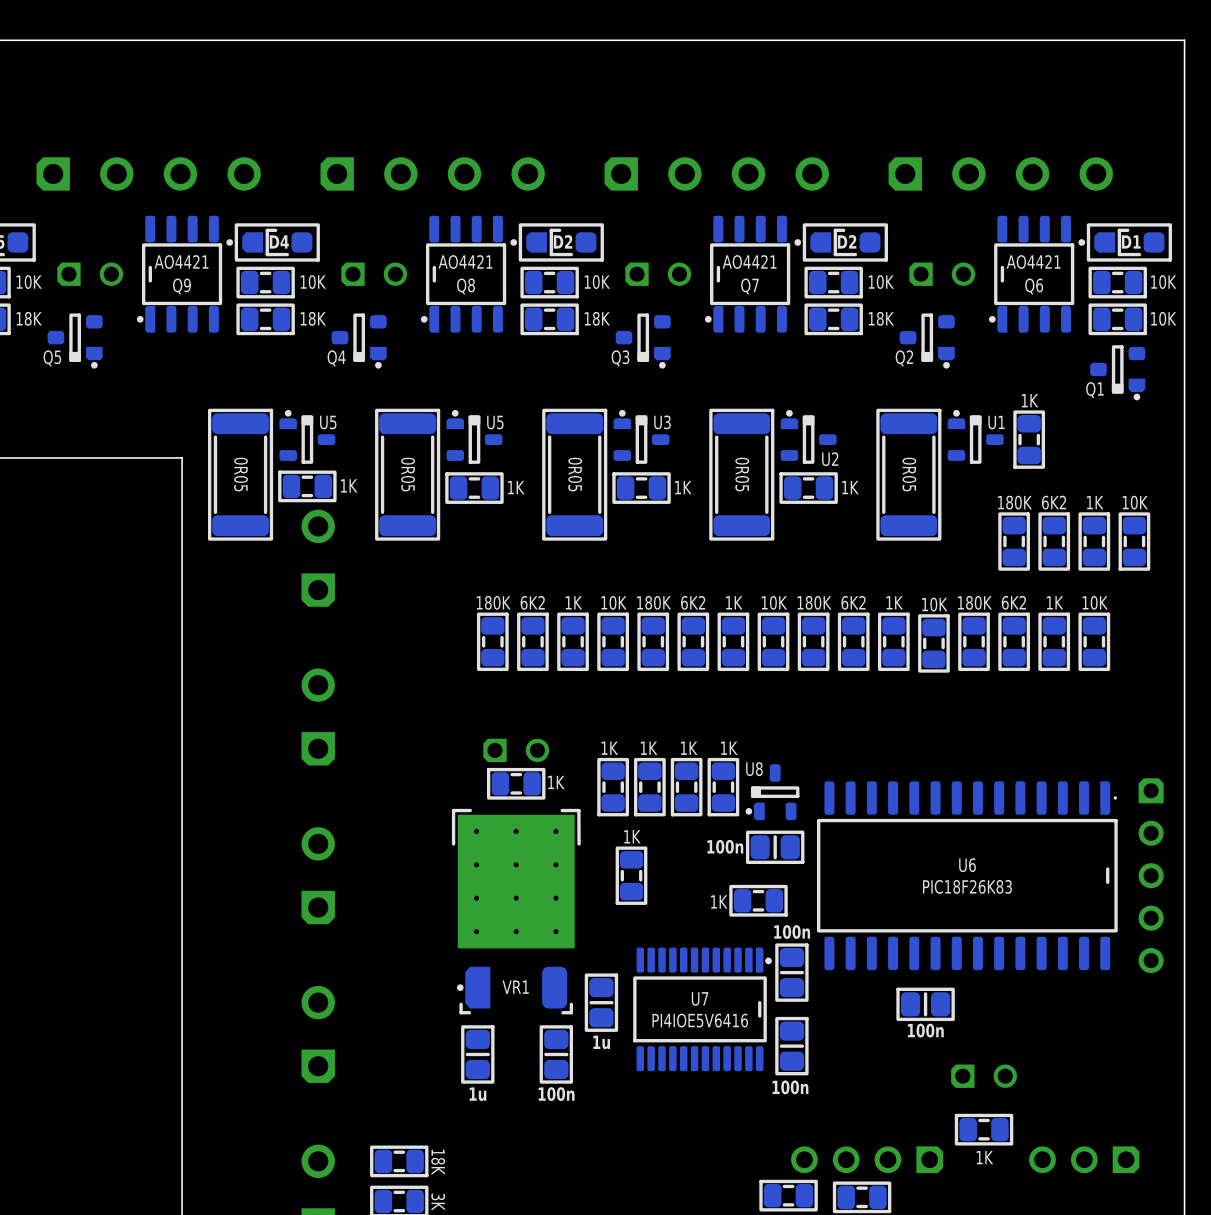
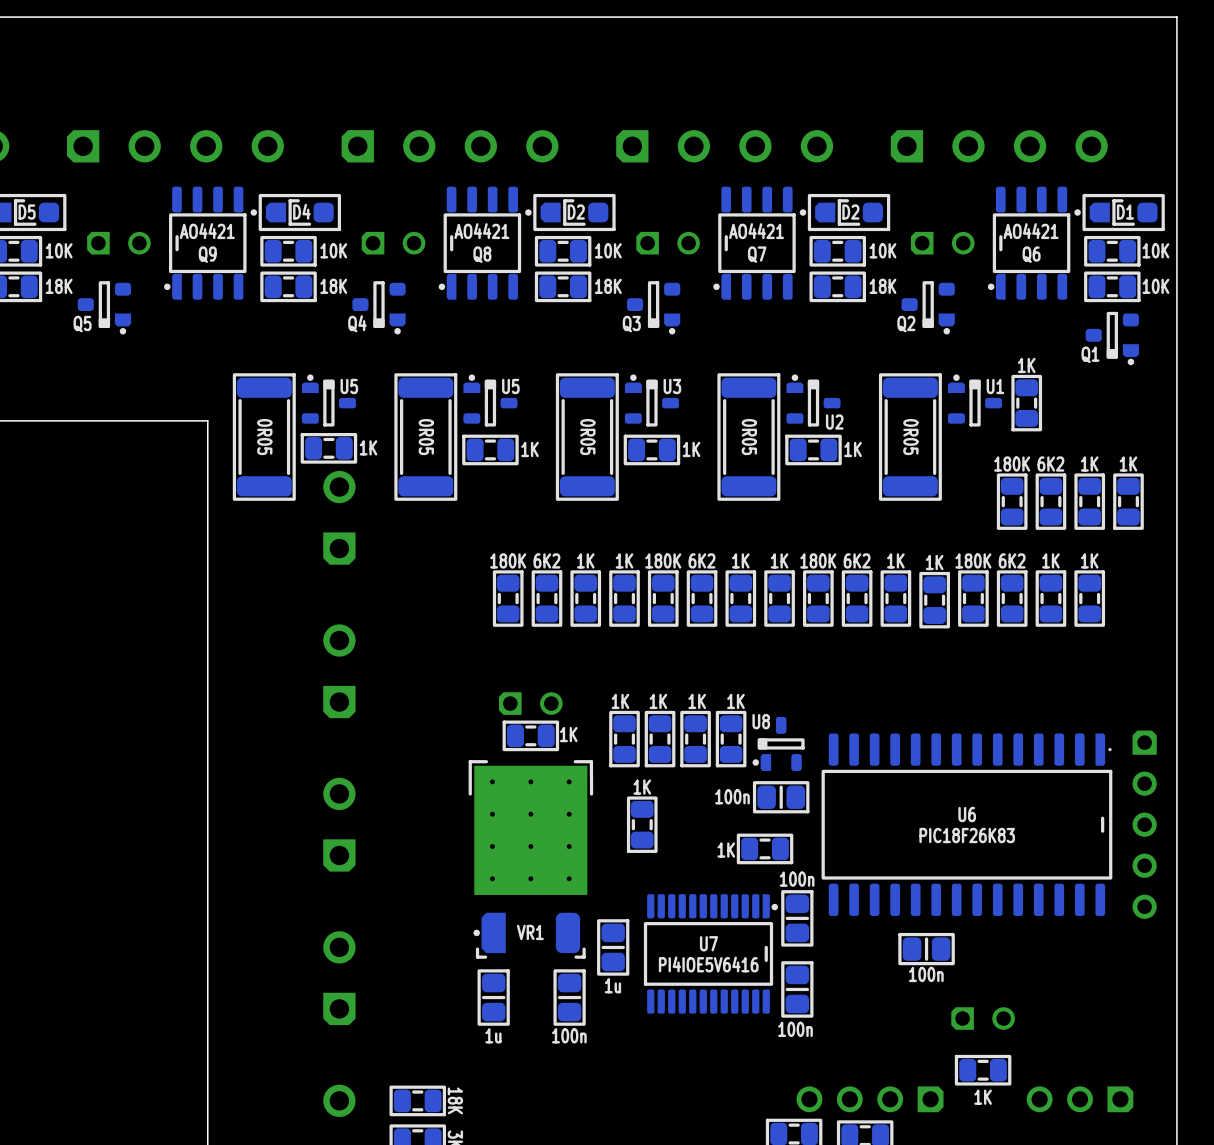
part value: 10K (1135, 502) -> 1K (1128, 464)
part value: 10K (614, 602) -> 1K (624, 560)
part value: 10K (774, 602) -> 1K (779, 560)
part value: 10K (1095, 602) -> 1K (1089, 560)
part value: 10K (934, 604) -> 1K (934, 562)

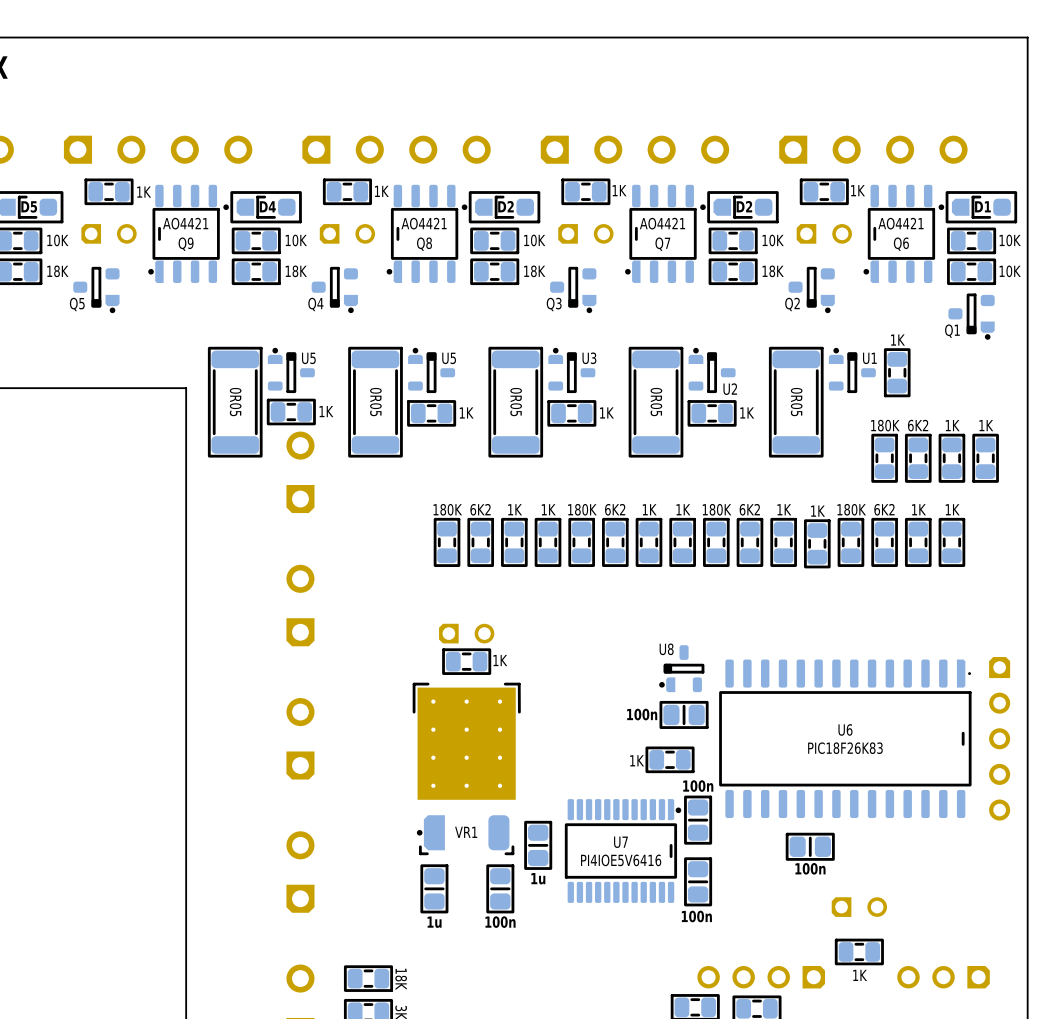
part: none -> 1K (109, 191)
part: none -> 1K (347, 191)
part: none -> 1K (585, 191)
part: none -> 1K (824, 191)
part: 1K (624, 739) -> none
part: 1K (660, 739) -> none
part: 1K (695, 739) -> none
part: 1K (731, 739) -> none
part: 1K (642, 824) -> none

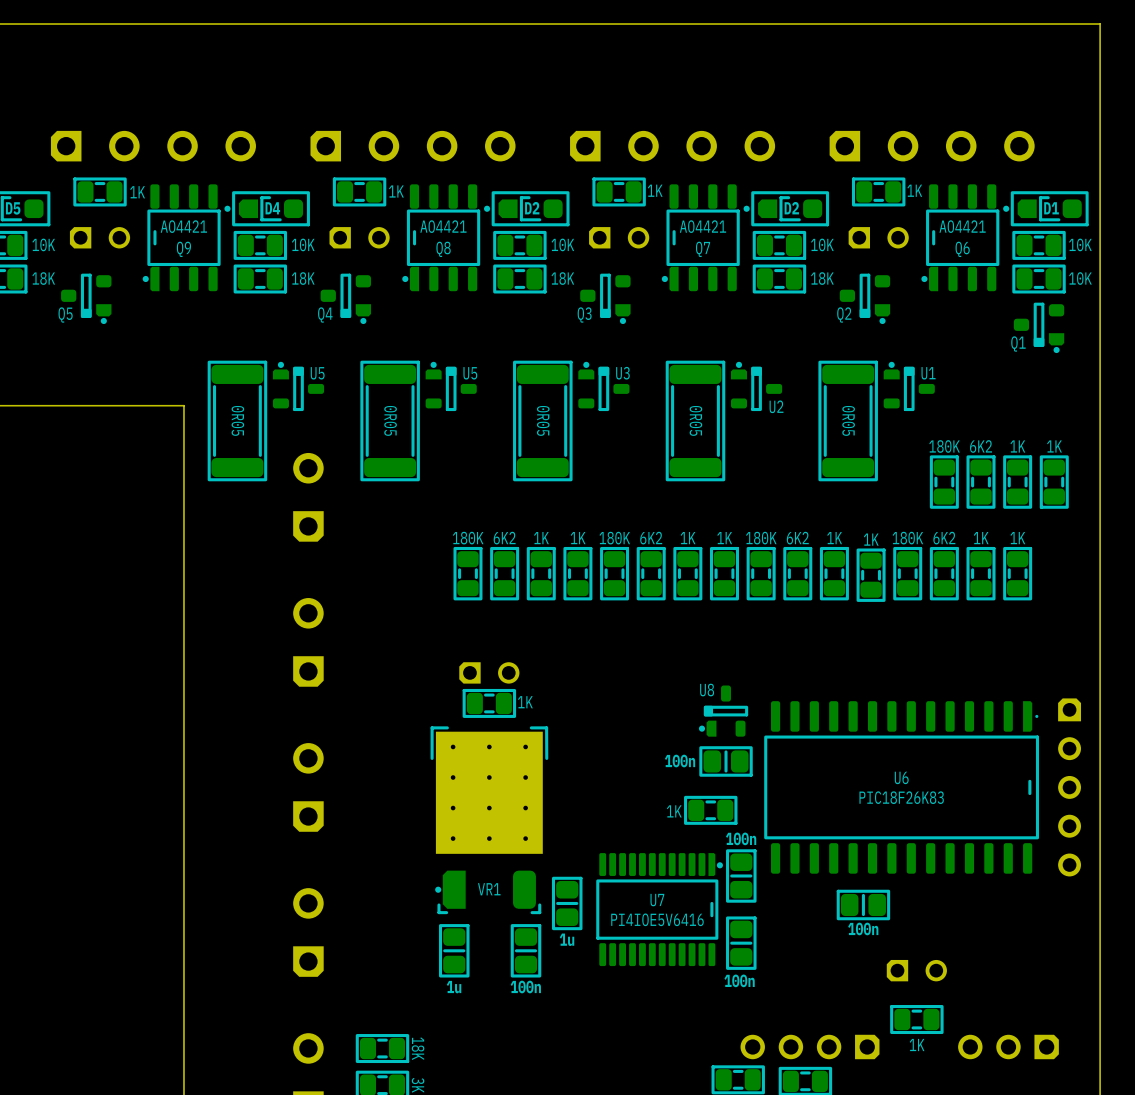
part: 1K (897, 372) -> none
part: 1K (291, 412) -> none
part: 1K (431, 413) -> none
part: 1K (571, 413) -> none
part: 1K (712, 413) -> none

